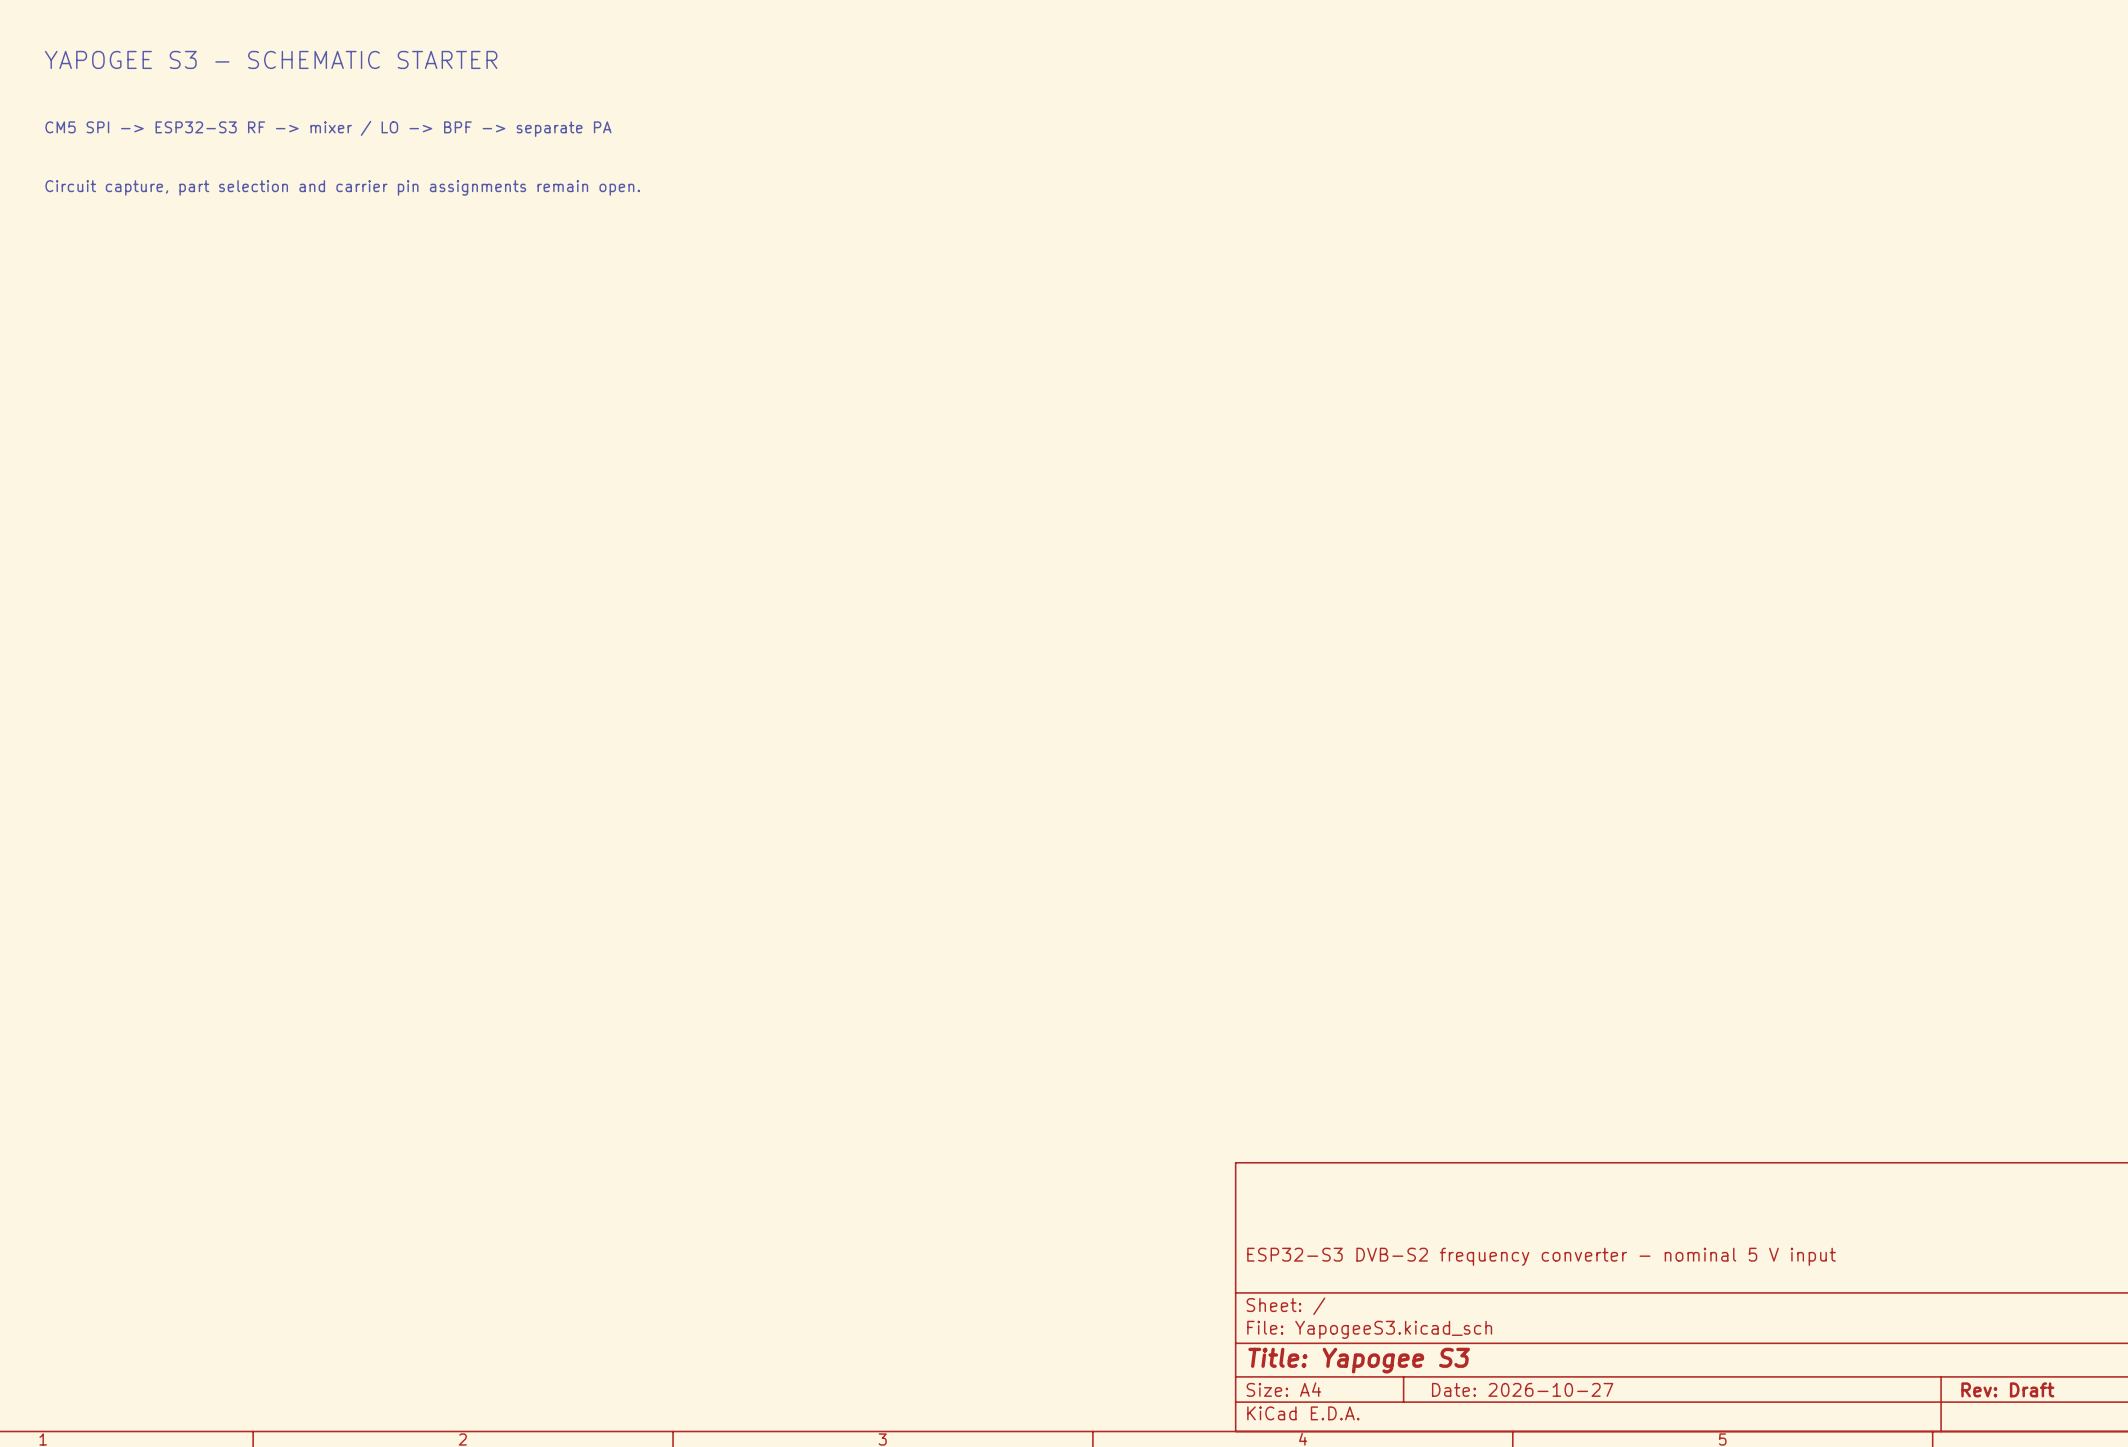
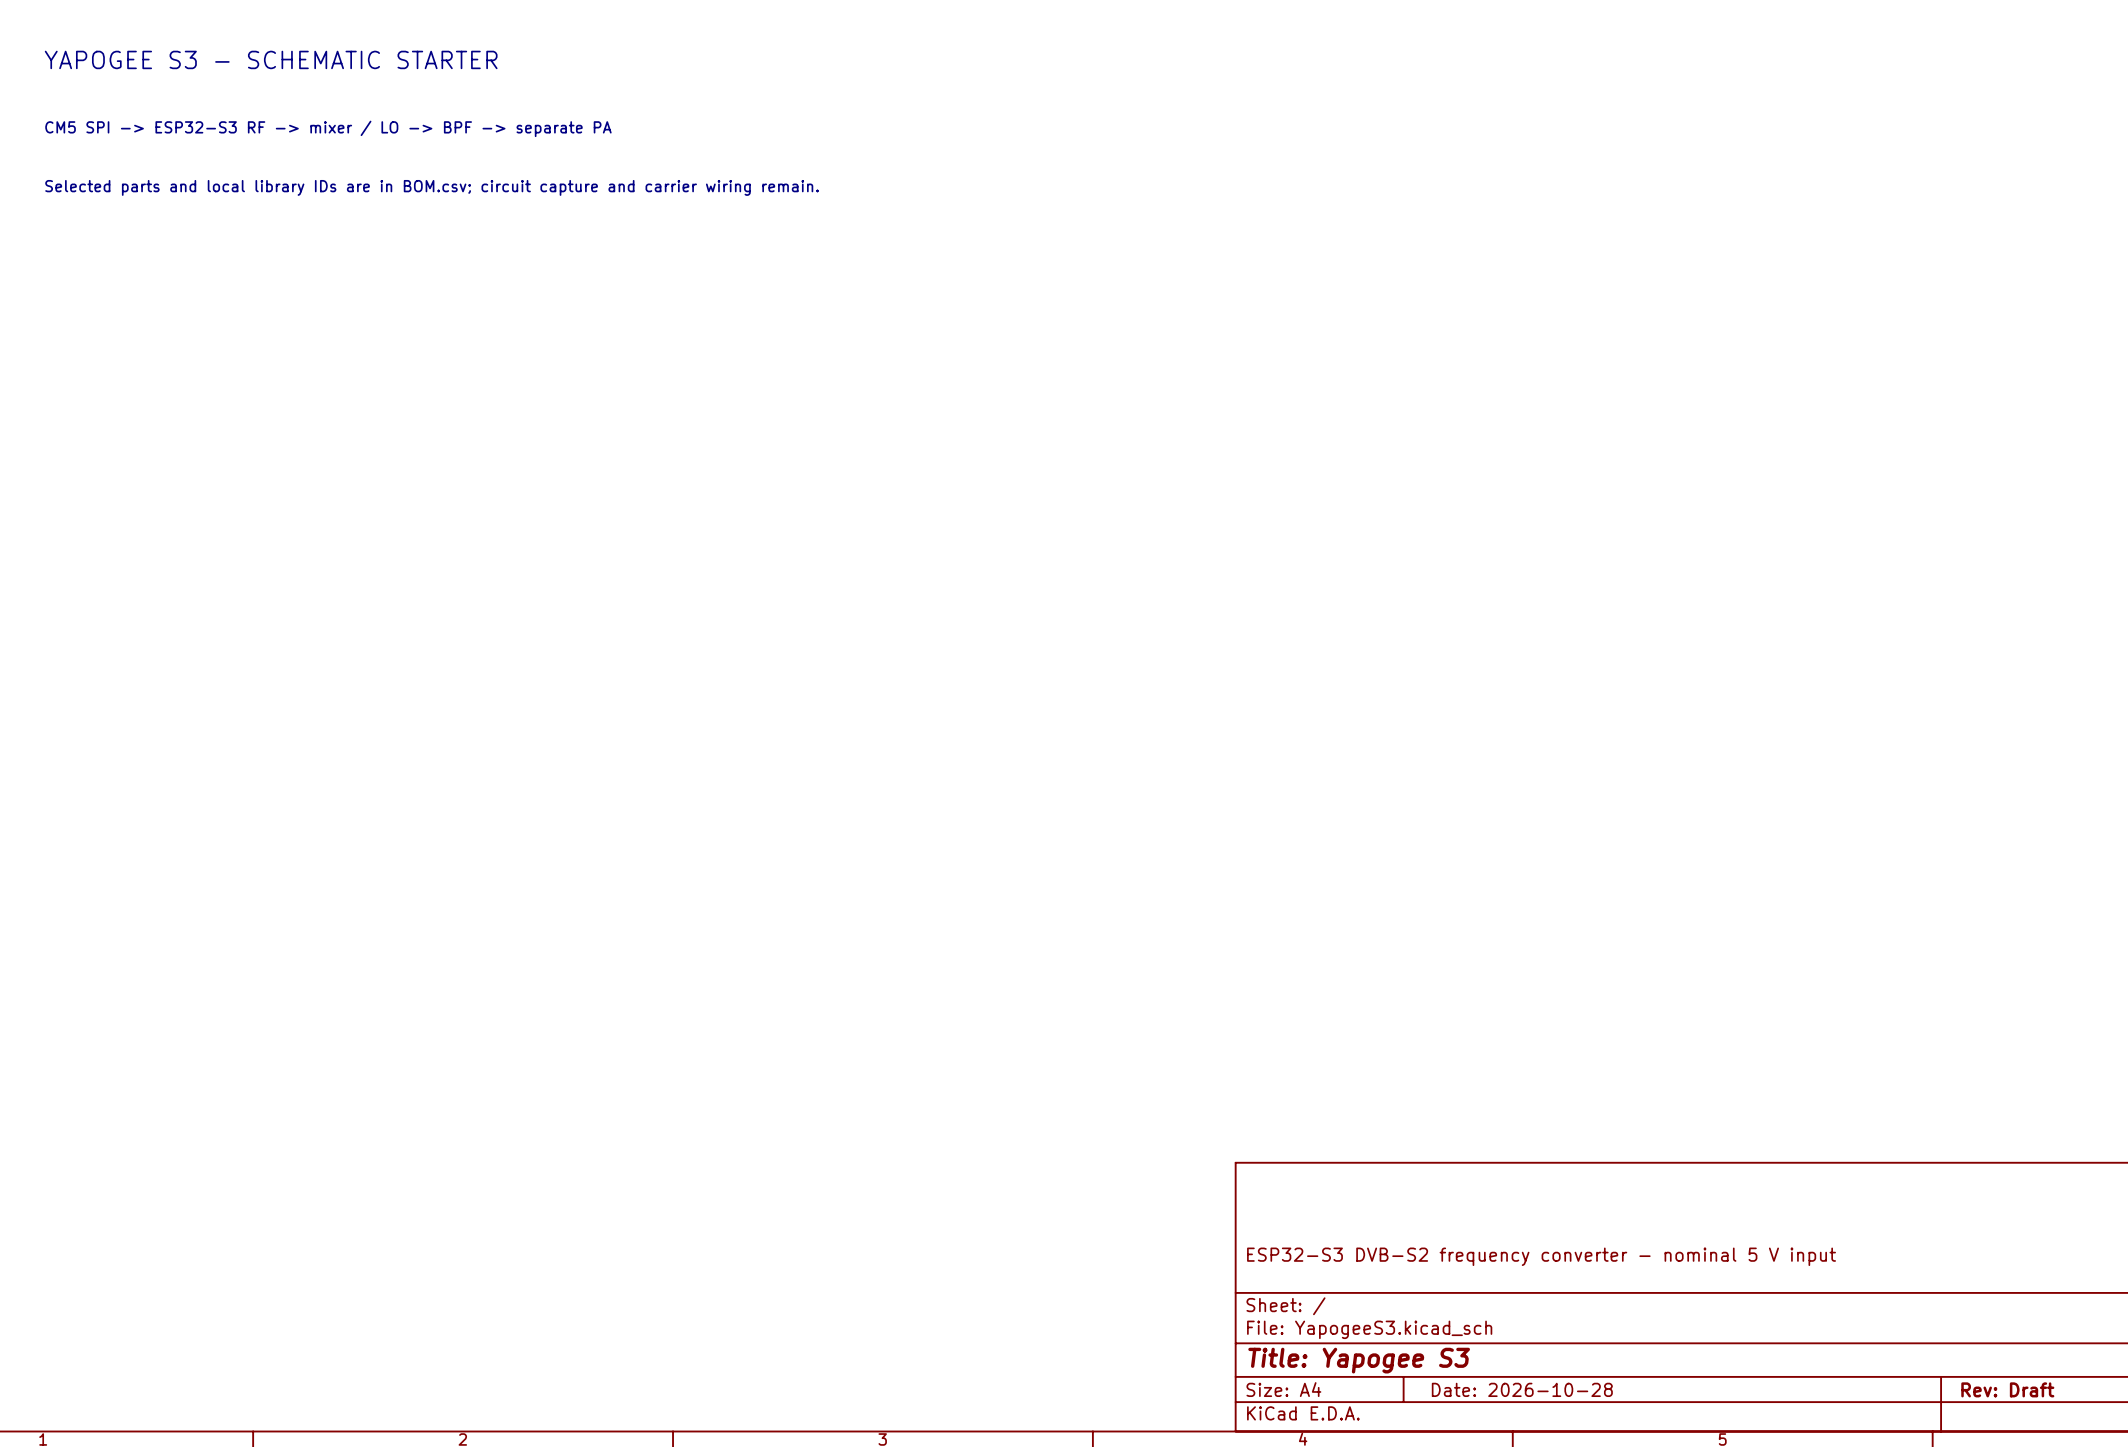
text: Circuit capture, part selection and carrier pin assignments remain open. (342, 187) -> Selected parts and local library IDs are in BOM.csv; circuit capture and carrier wiring remain. (432, 187)
title block: Date: 2026-10-27 (1522, 1389) -> Date: 2026-10-28 (1522, 1389)

